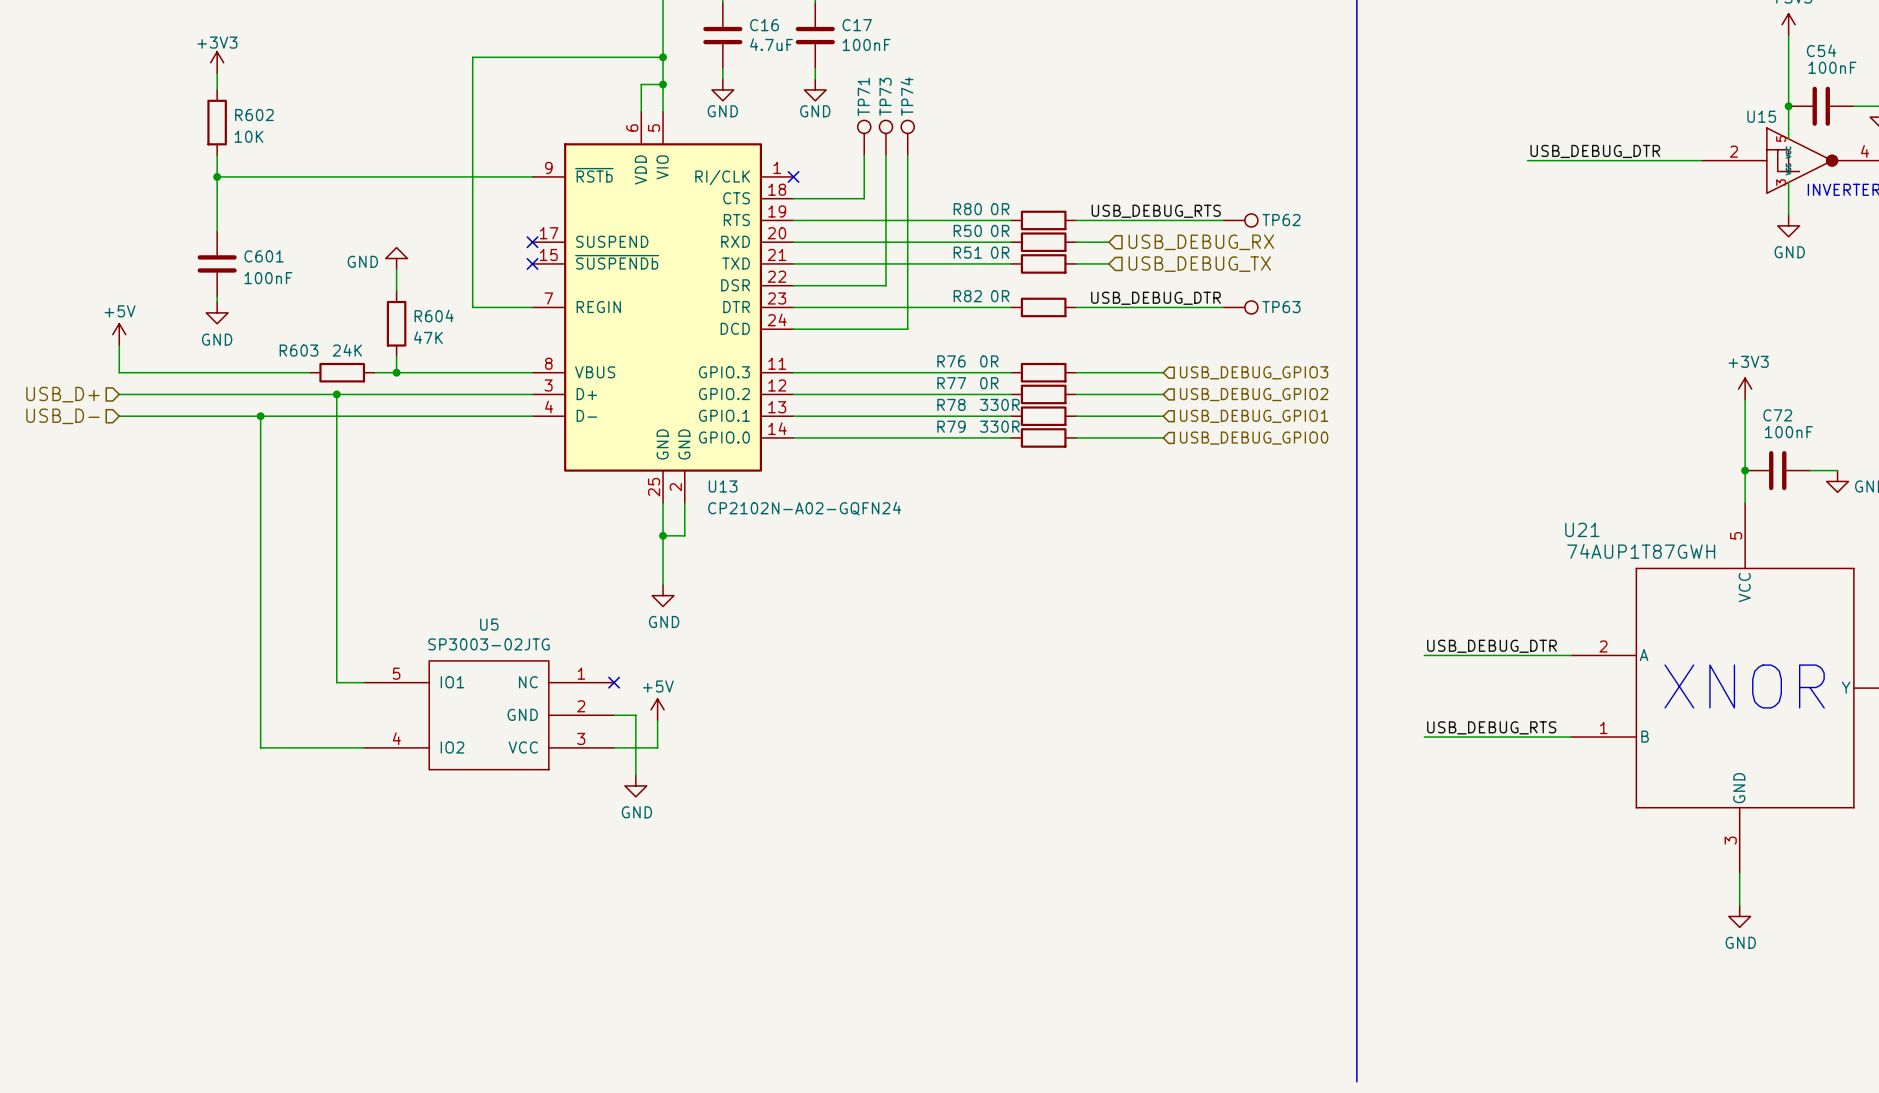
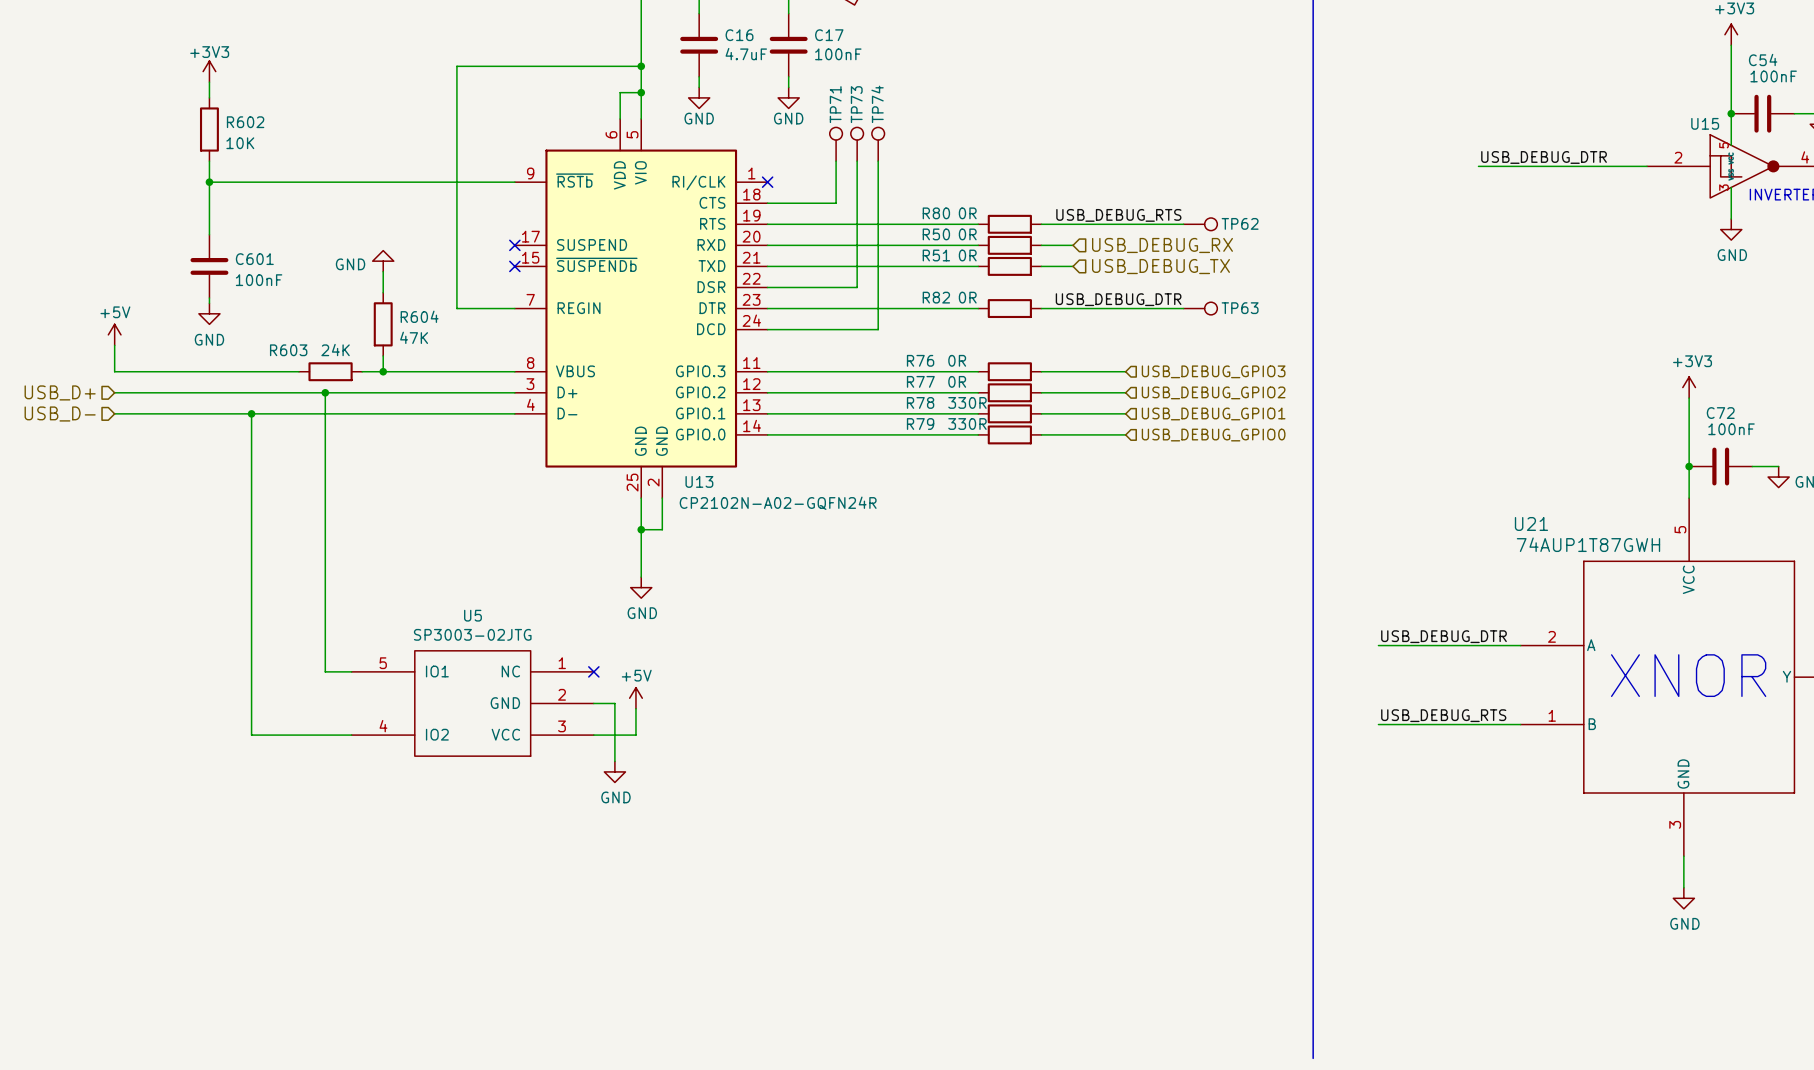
U13 value: CP2102N-A02-GQFN24 (804, 508) -> CP2102N-A02-GQFN24R (778, 503)

